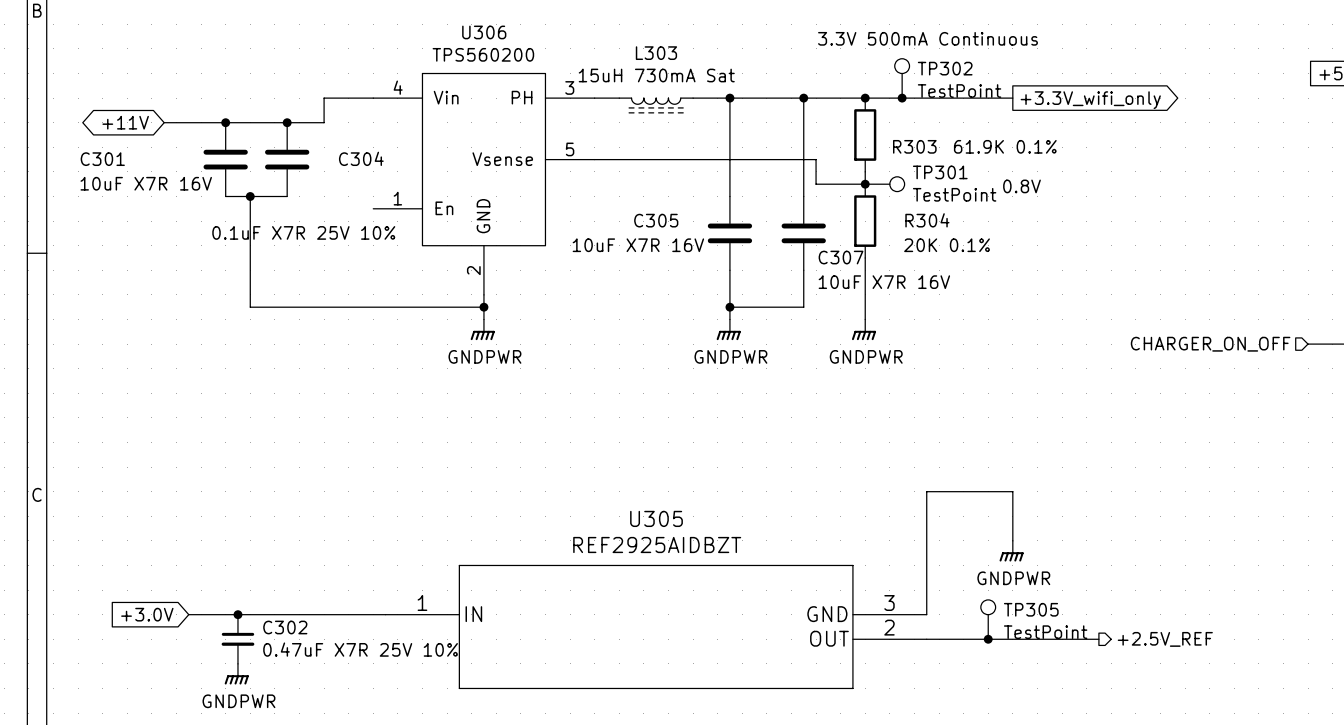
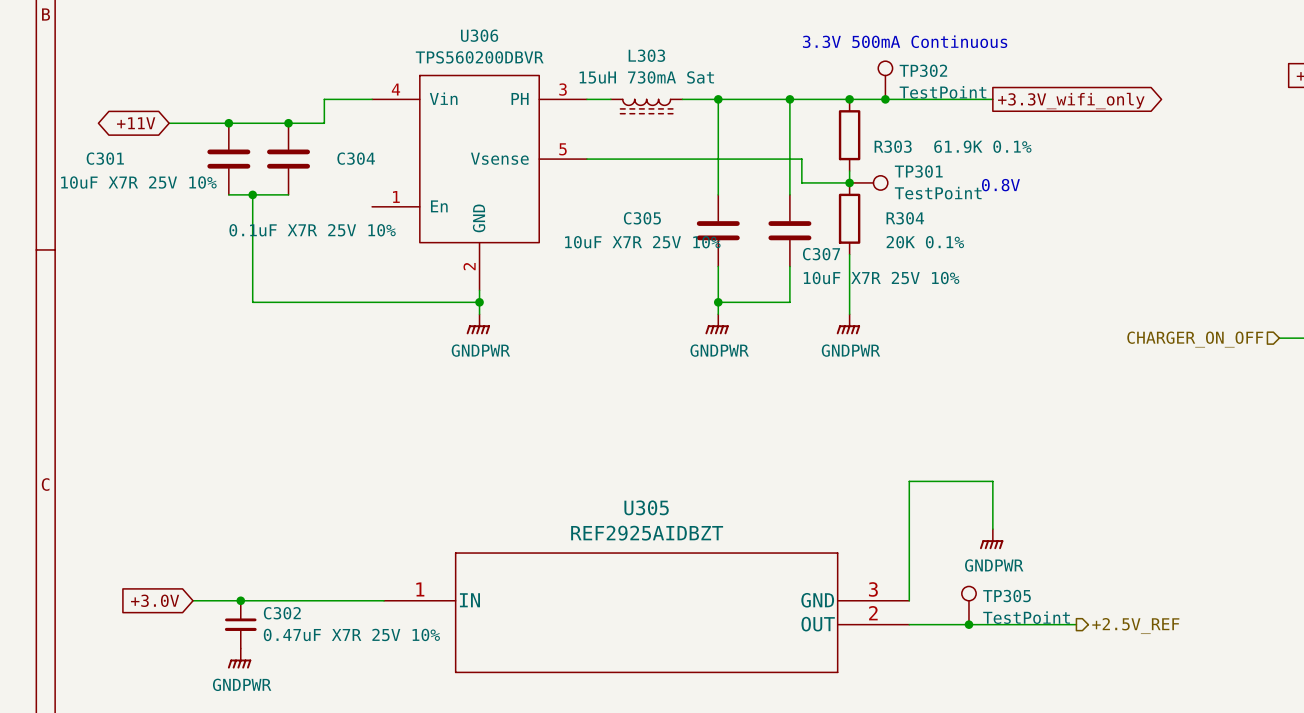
U306 value: TPS560200 (483, 54) -> TPS560200DBVR (479, 57)
C301 value: 10uF X7R 16V (146, 183) -> 10uF X7R 25V 10% (138, 182)
C305 value: 10uF X7R 16V (638, 245) -> 10uF X7R 25V 10% (642, 242)
C307 value: 10uF X7R 16V (884, 282) -> 10uF X7R 25V 10% (881, 278)

